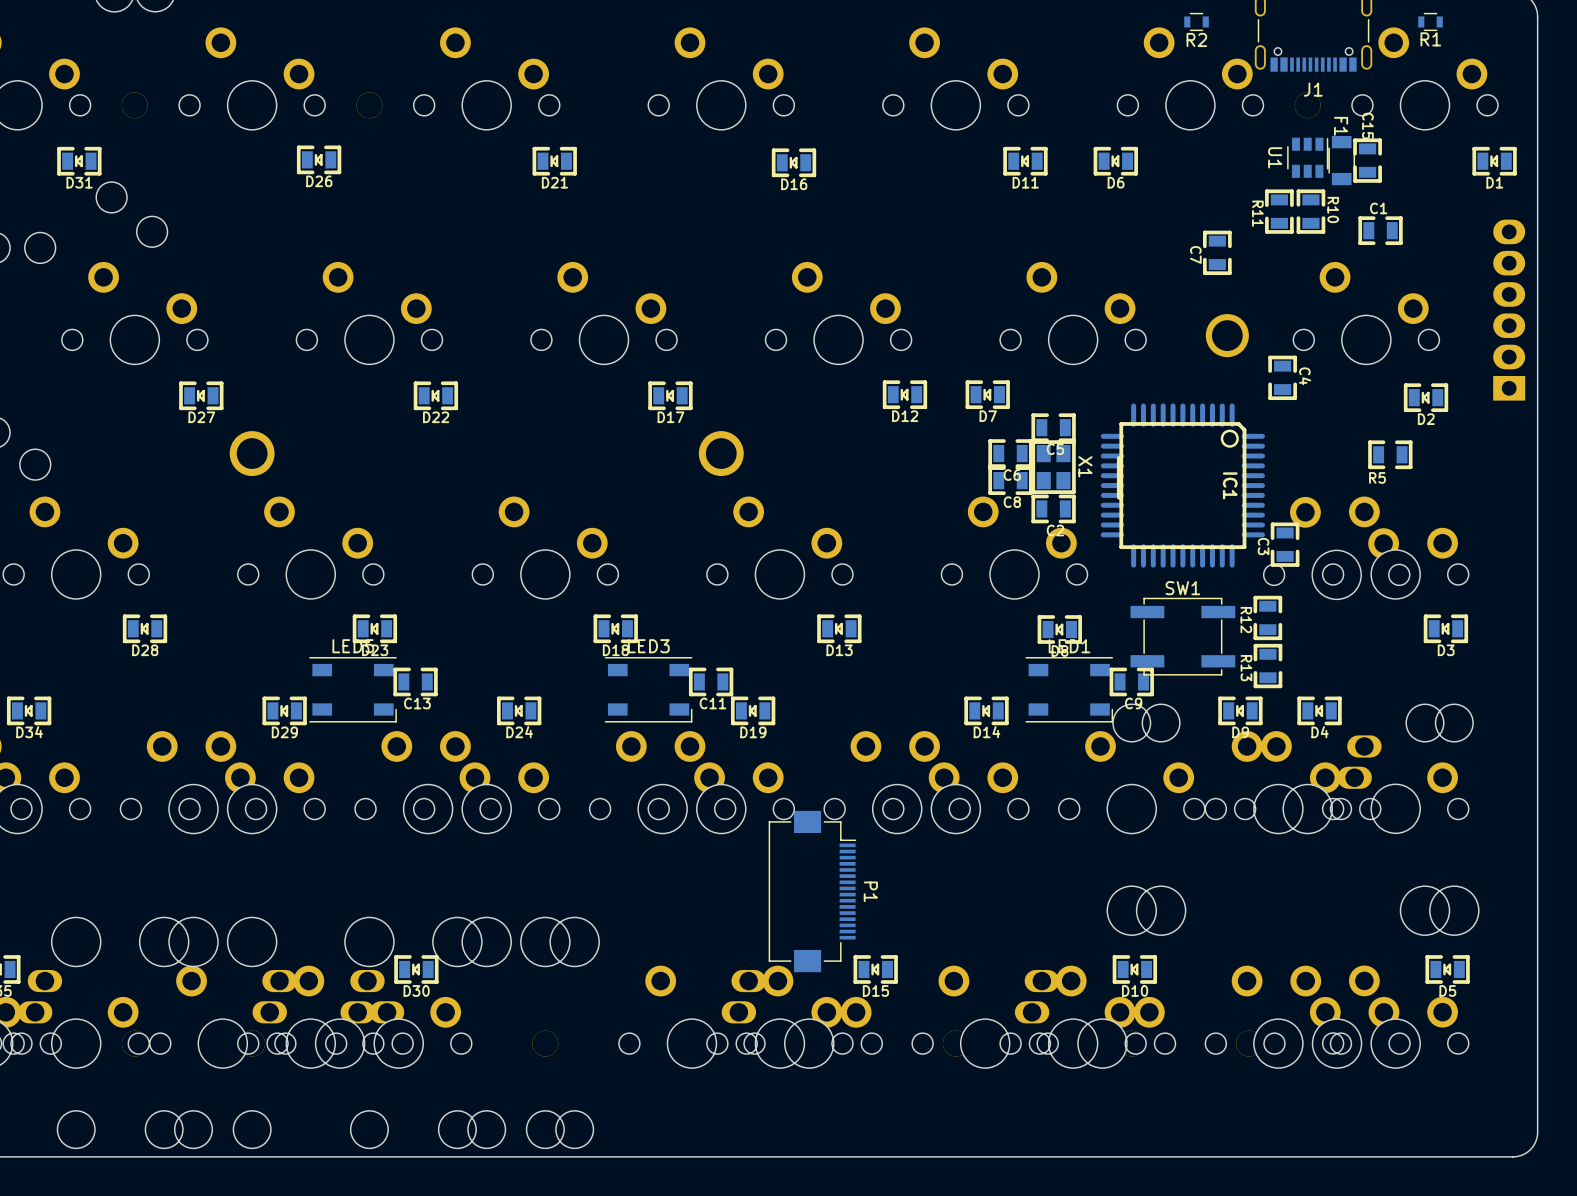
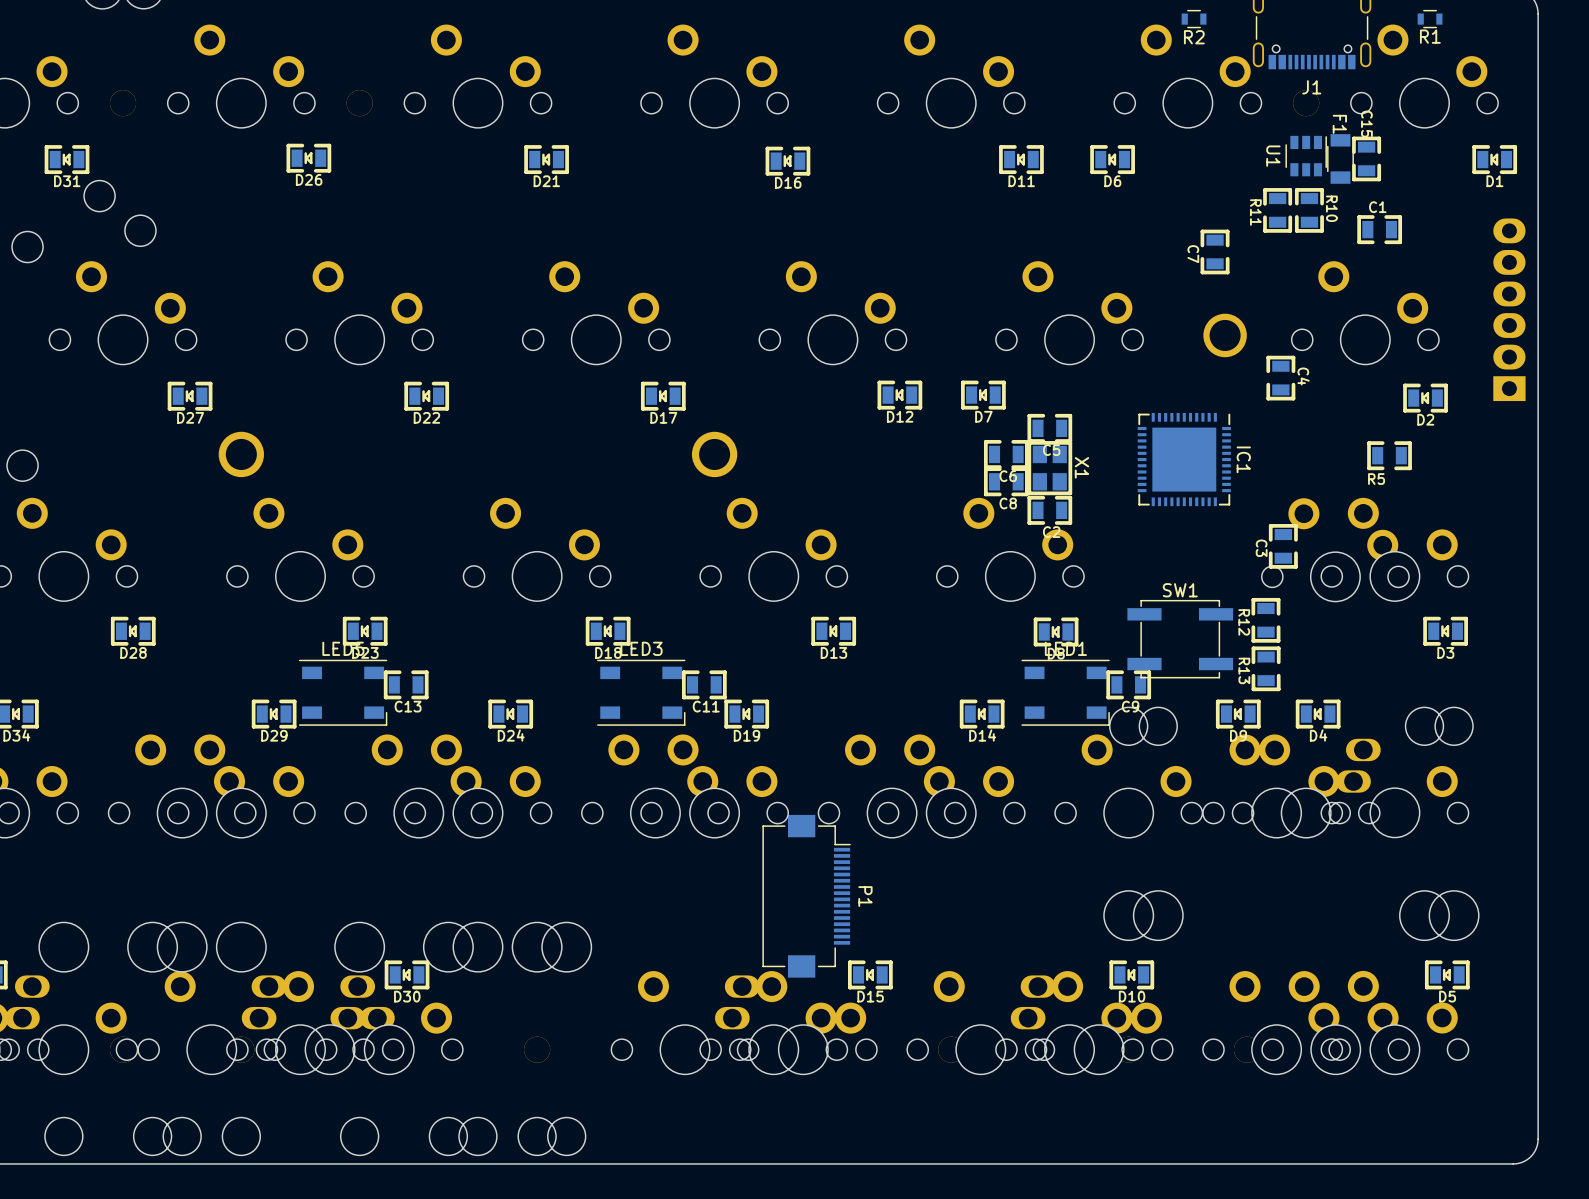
IC1 footprint: [1100, 403, 1265, 568] -> [1137, 412, 1231, 507]
line: (1119, 458) (1119, 497) -> none

